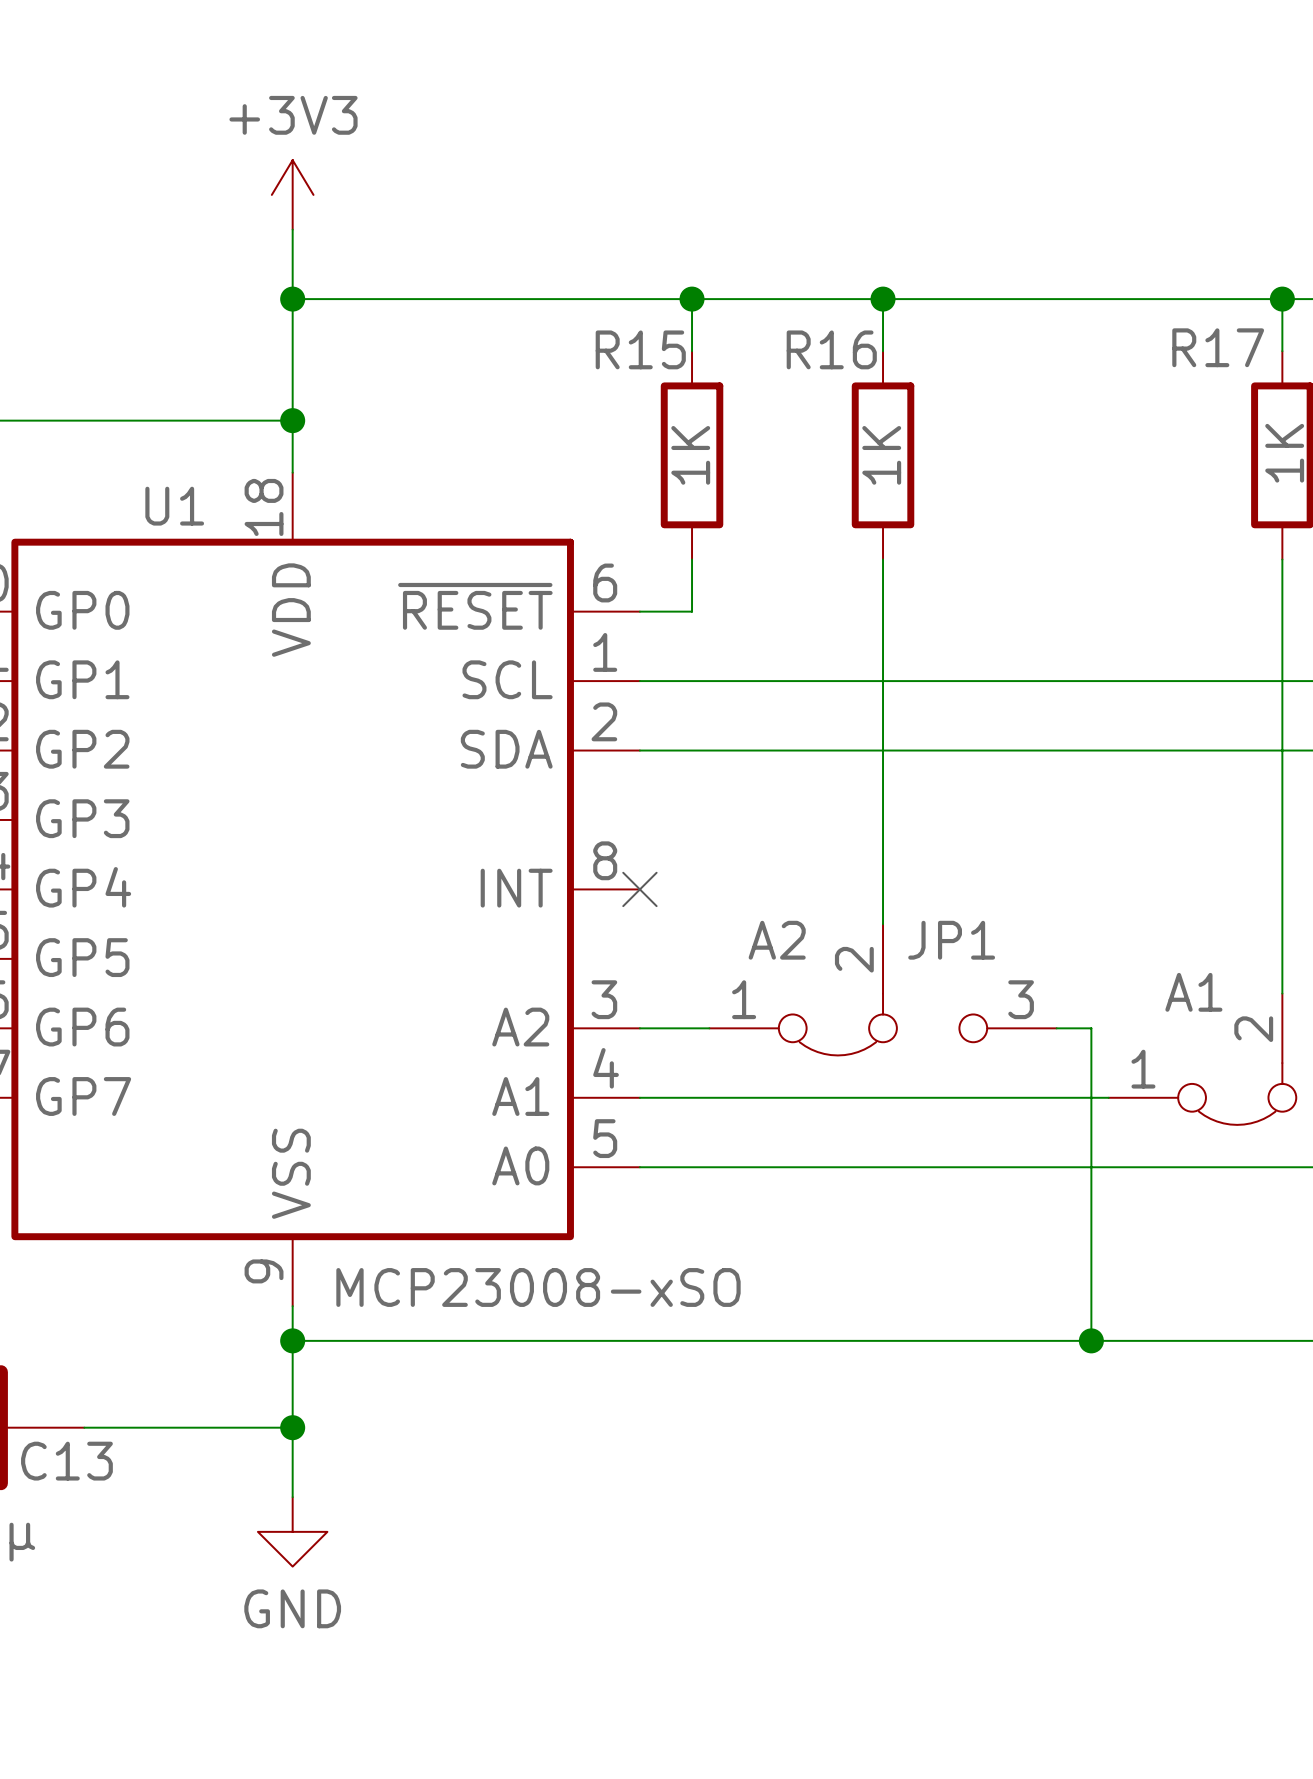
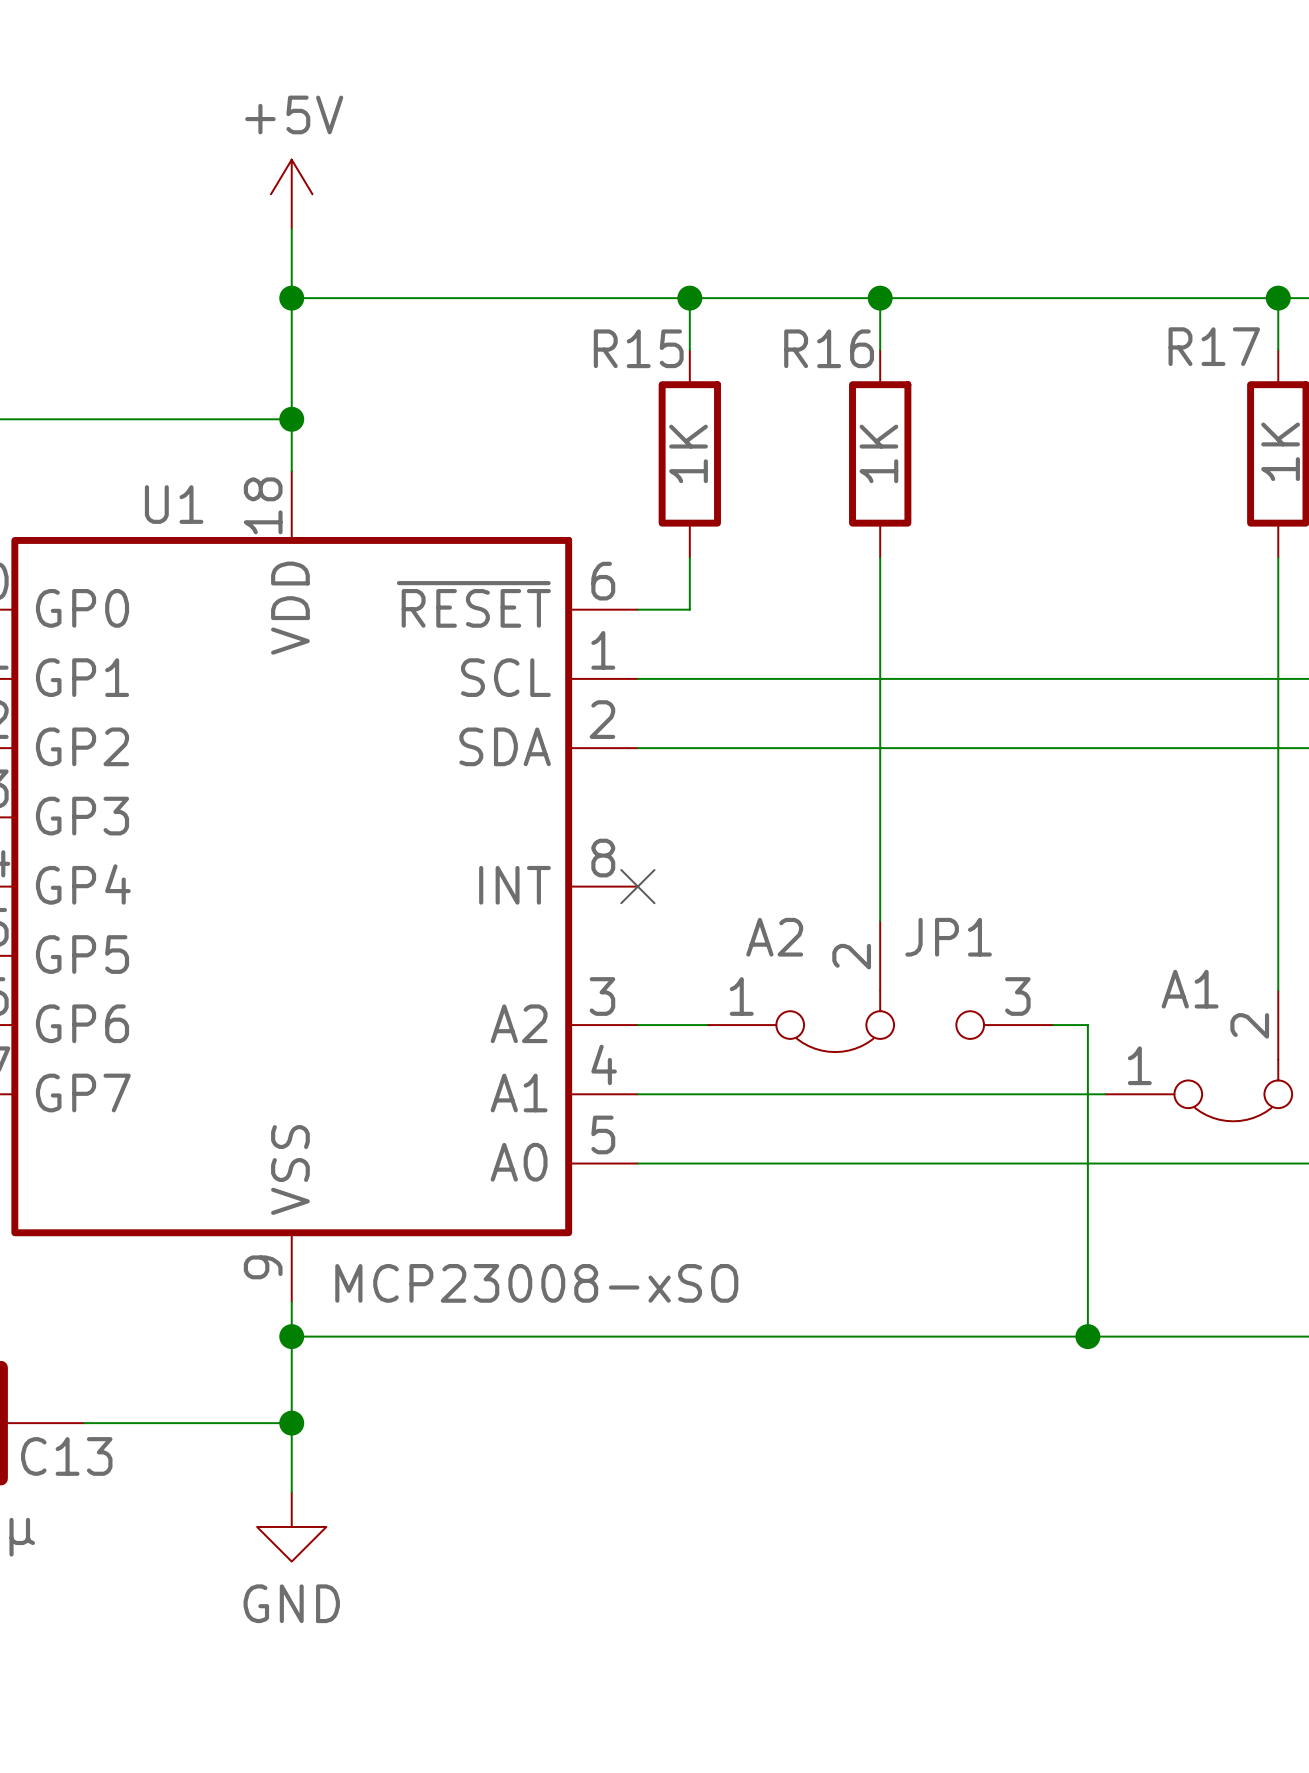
power symbol: +3V3 (292, 194) -> +5V (291, 194)

